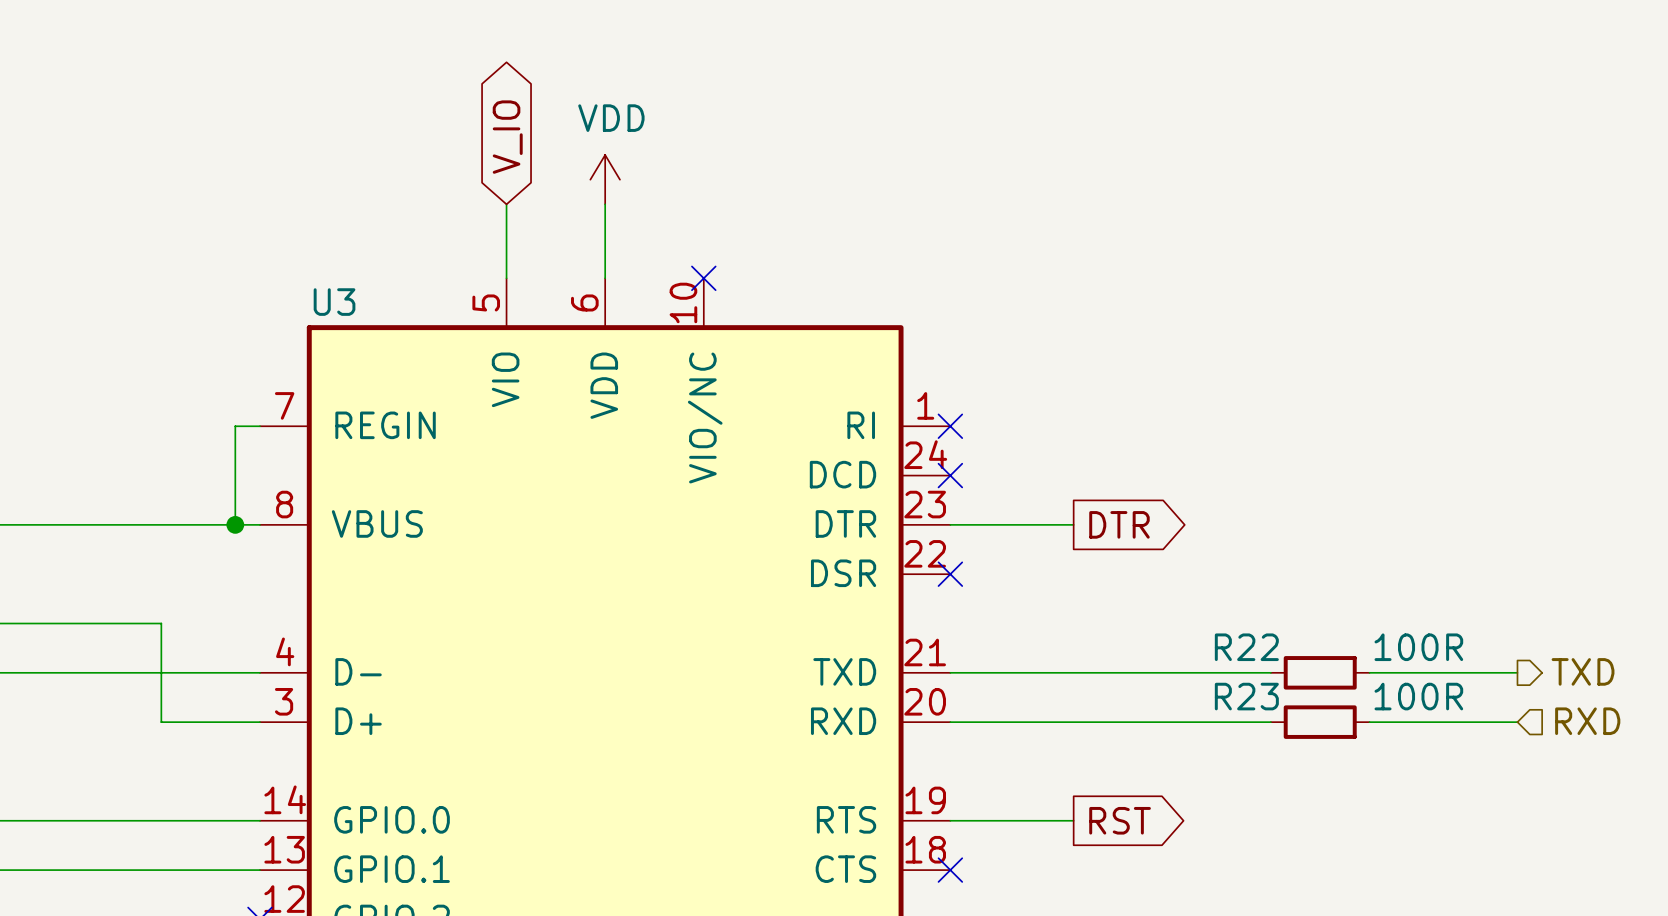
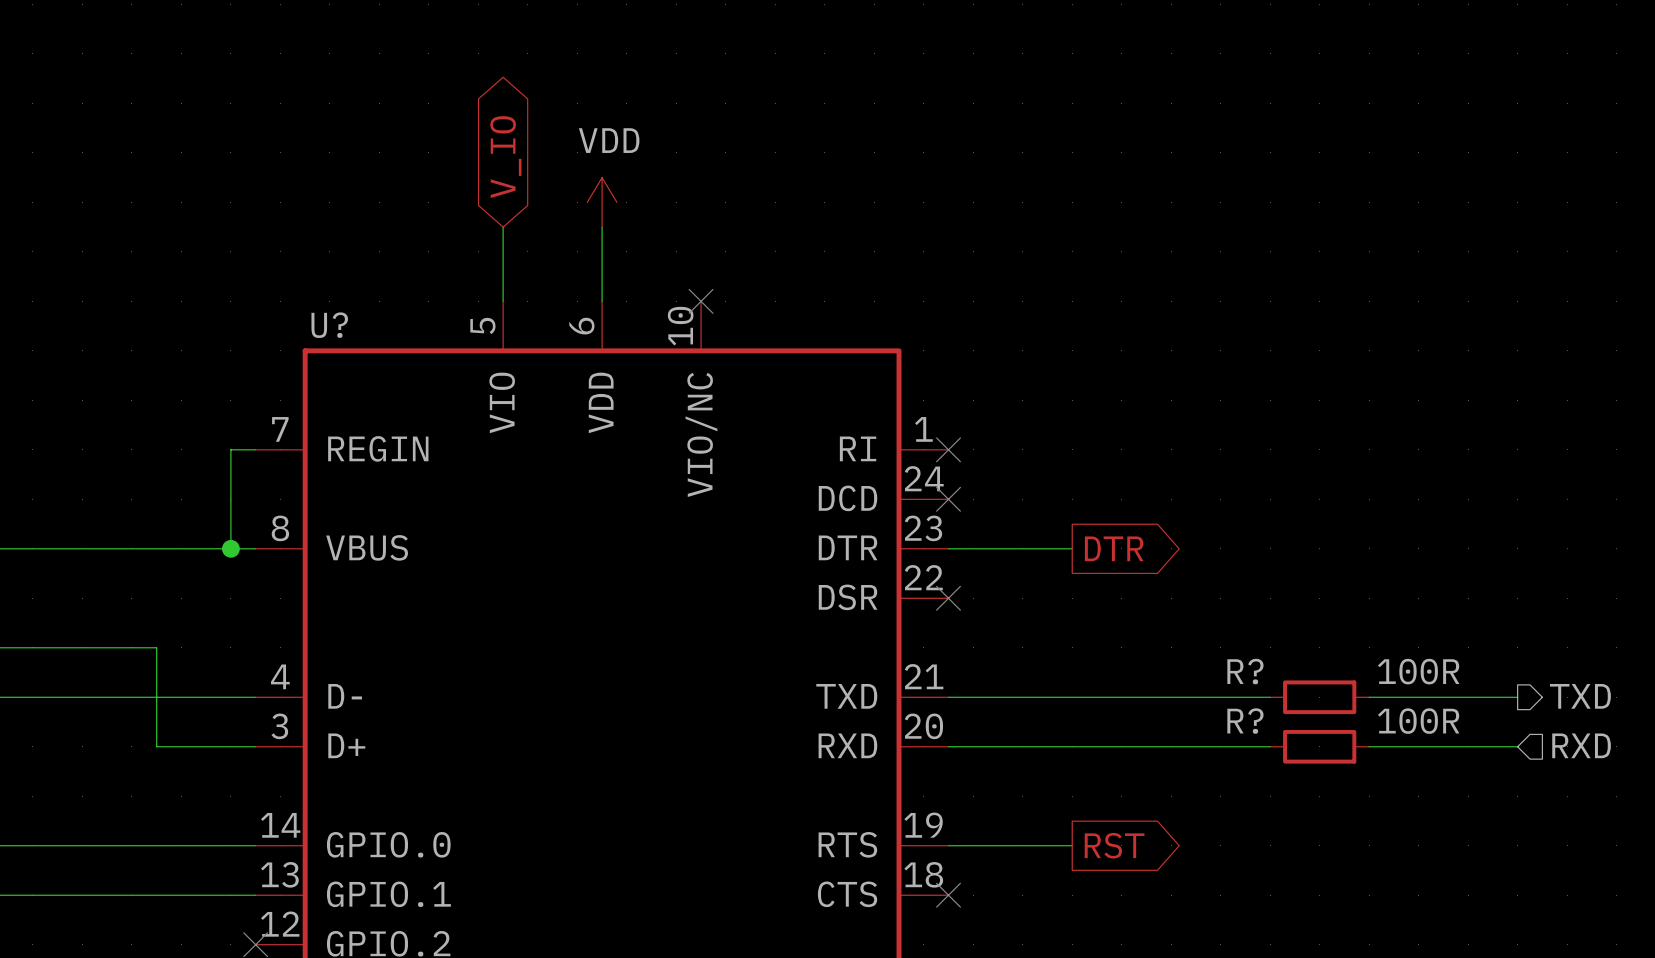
U3 name: U3 (334, 302) -> U? (329, 325)
R22 name: R22 (1246, 647) -> R? (1245, 671)
R23 name: R23 (1246, 696) -> R? (1245, 721)

